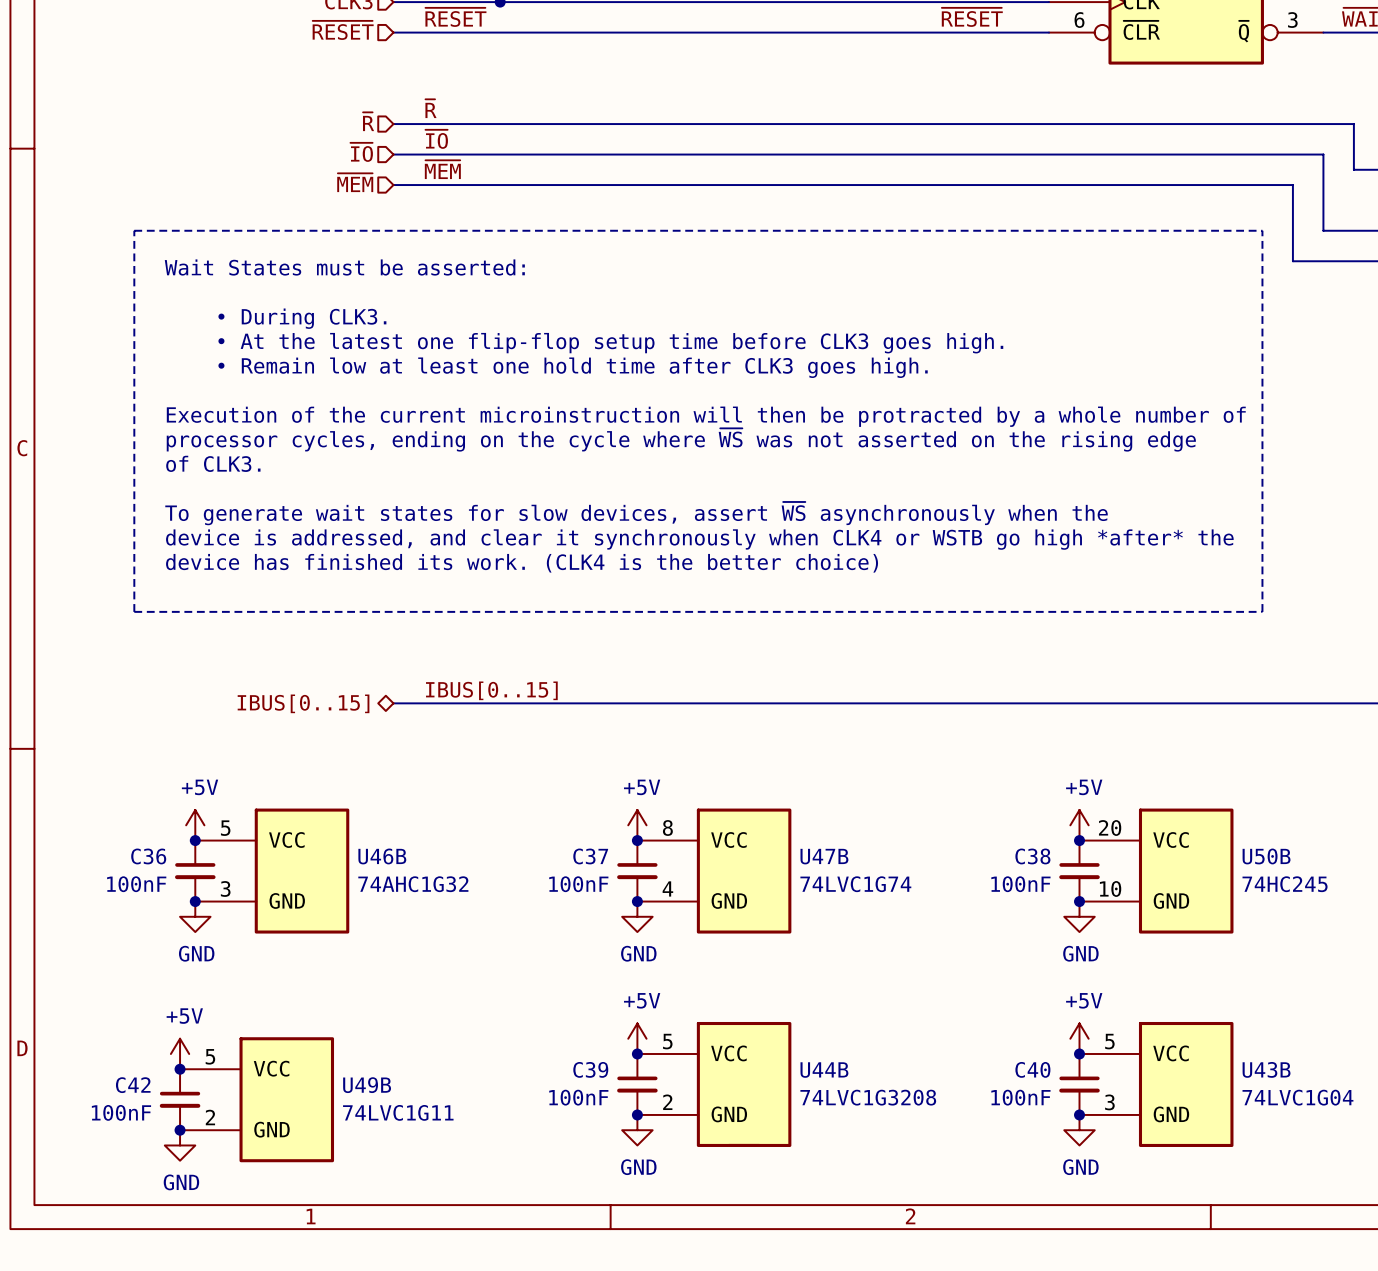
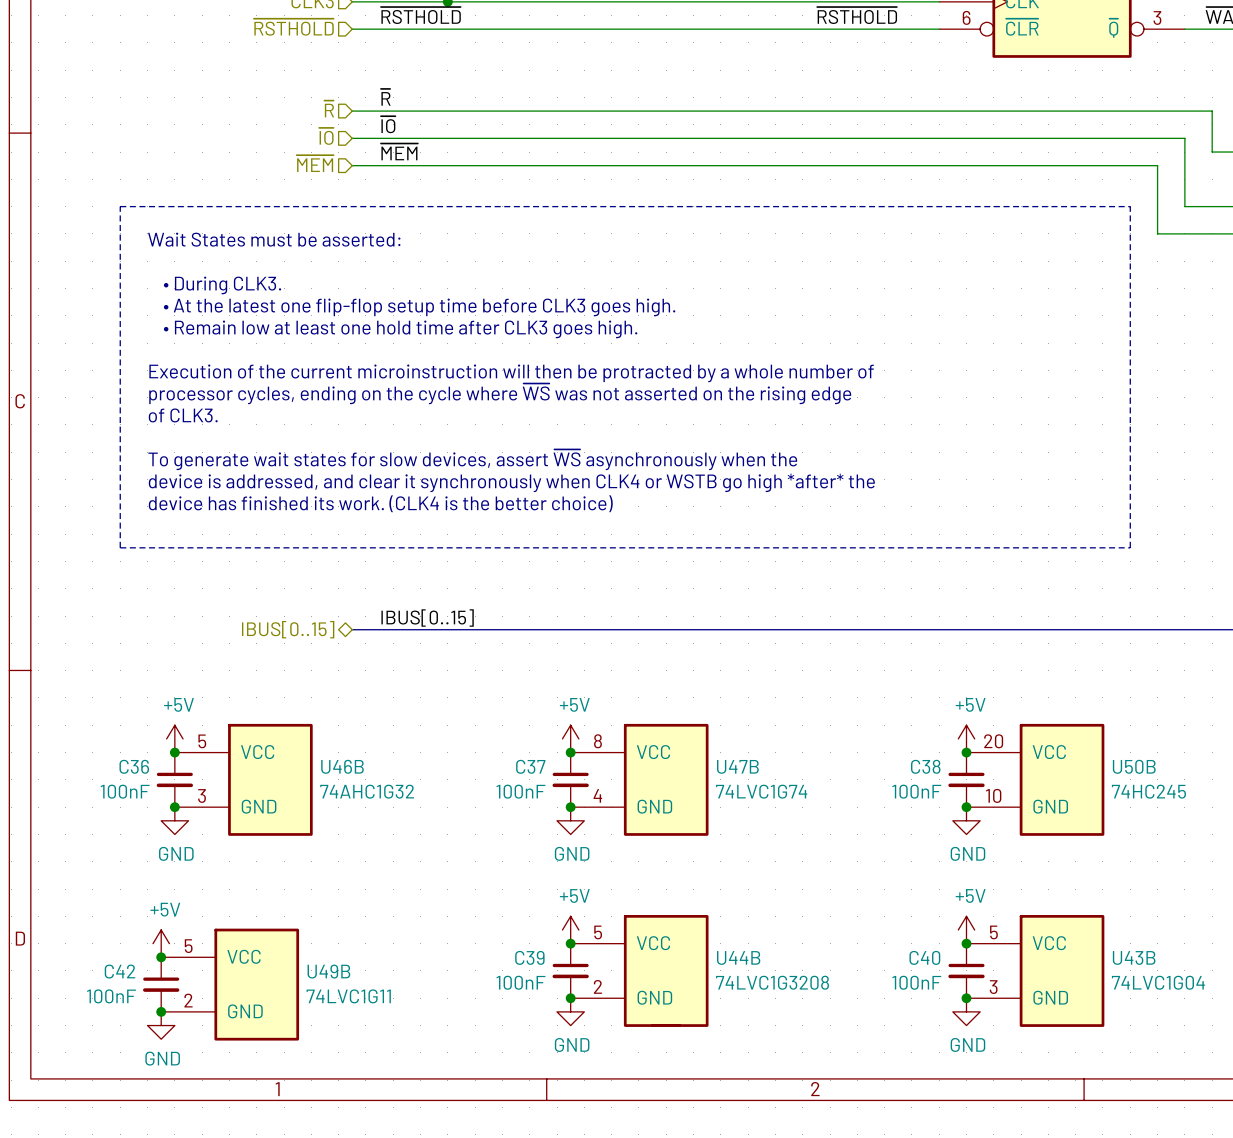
label: ~{RESET} (455, 17) -> ~{RSTHOLD} (420, 15)
label: ~{RESET} (972, 17) -> ~{RSTHOLD} (857, 15)
hierarchical label: ~{RESET} (343, 30) -> ~{RSTHOLD} (293, 27)

